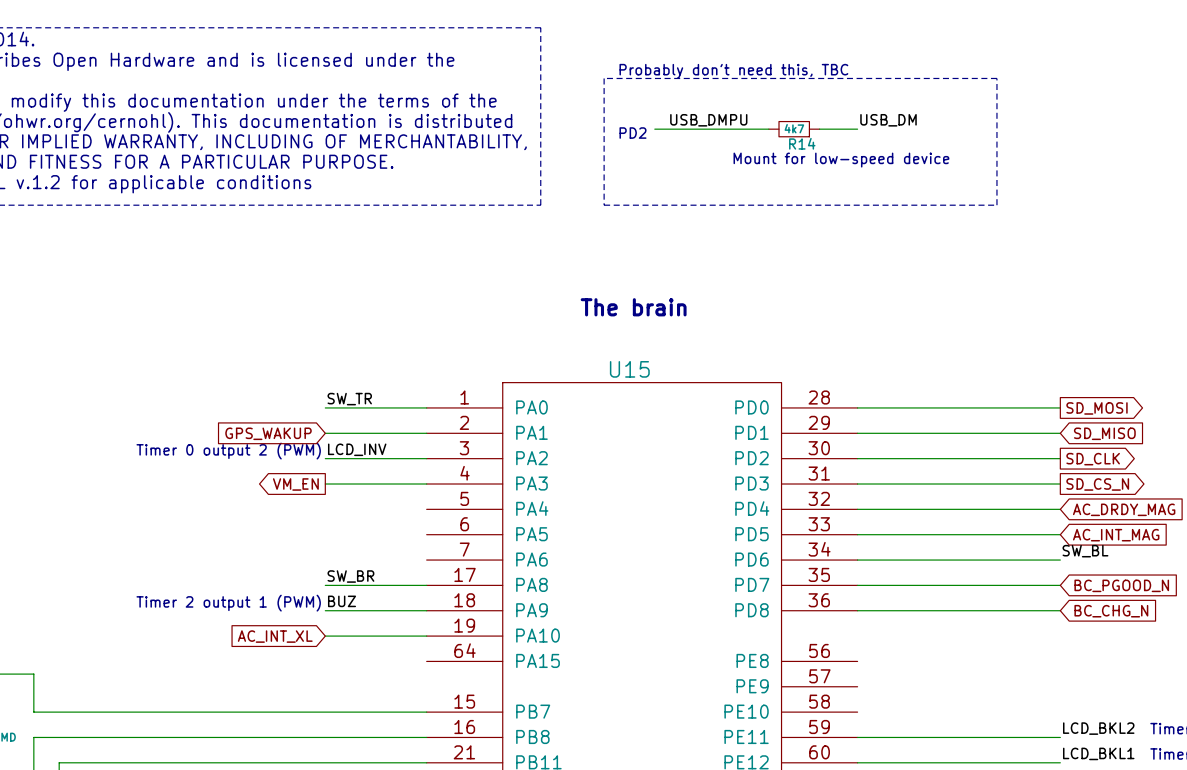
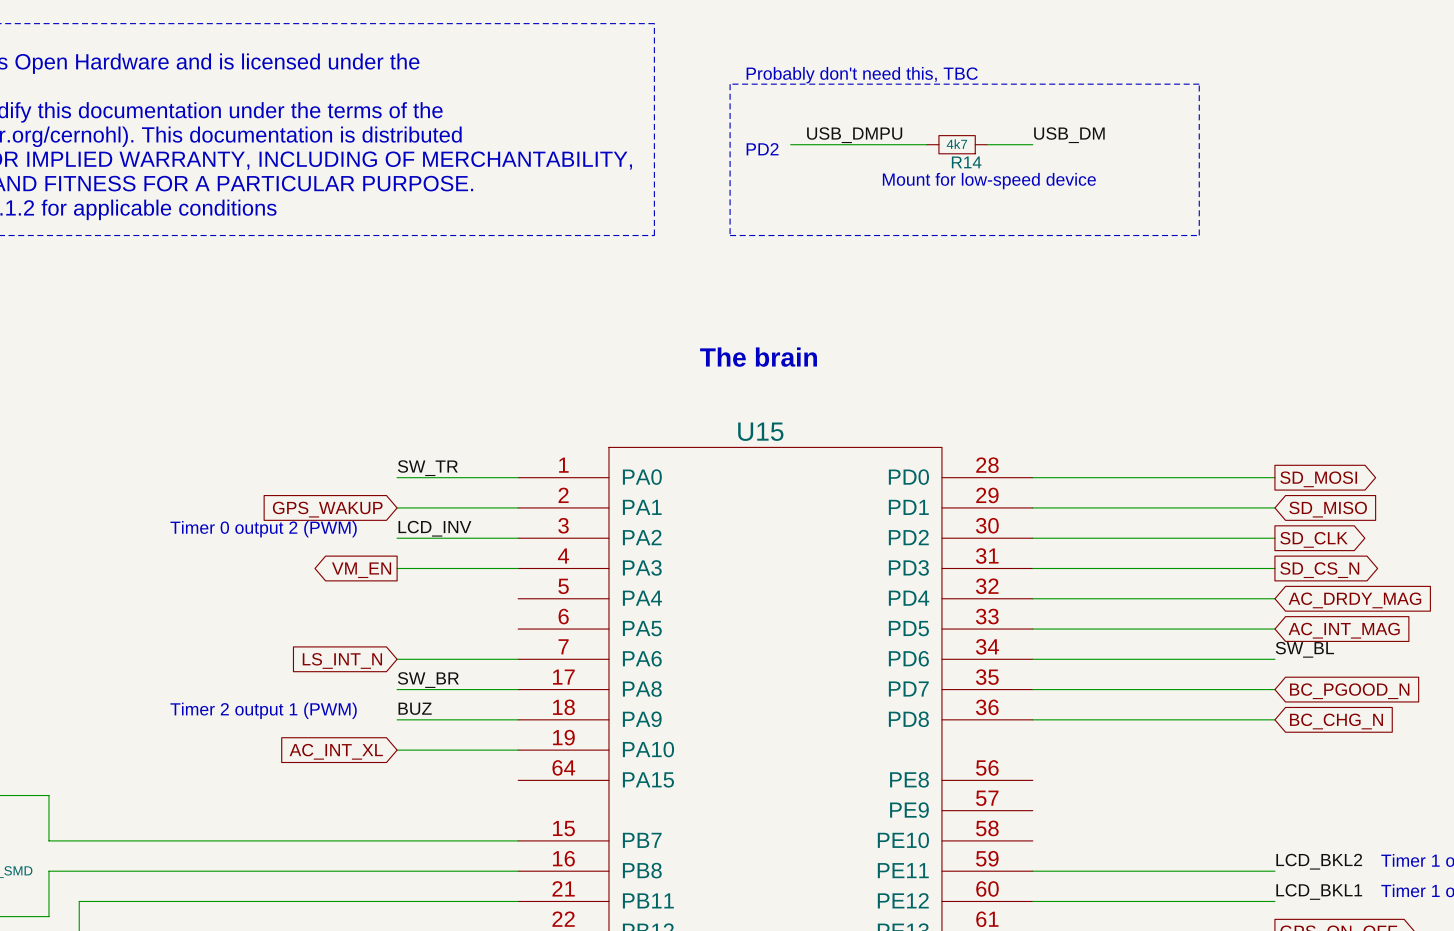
global label: none -> LS_INT_N (342, 660)
wire: none -> (397, 659) (518, 659)

